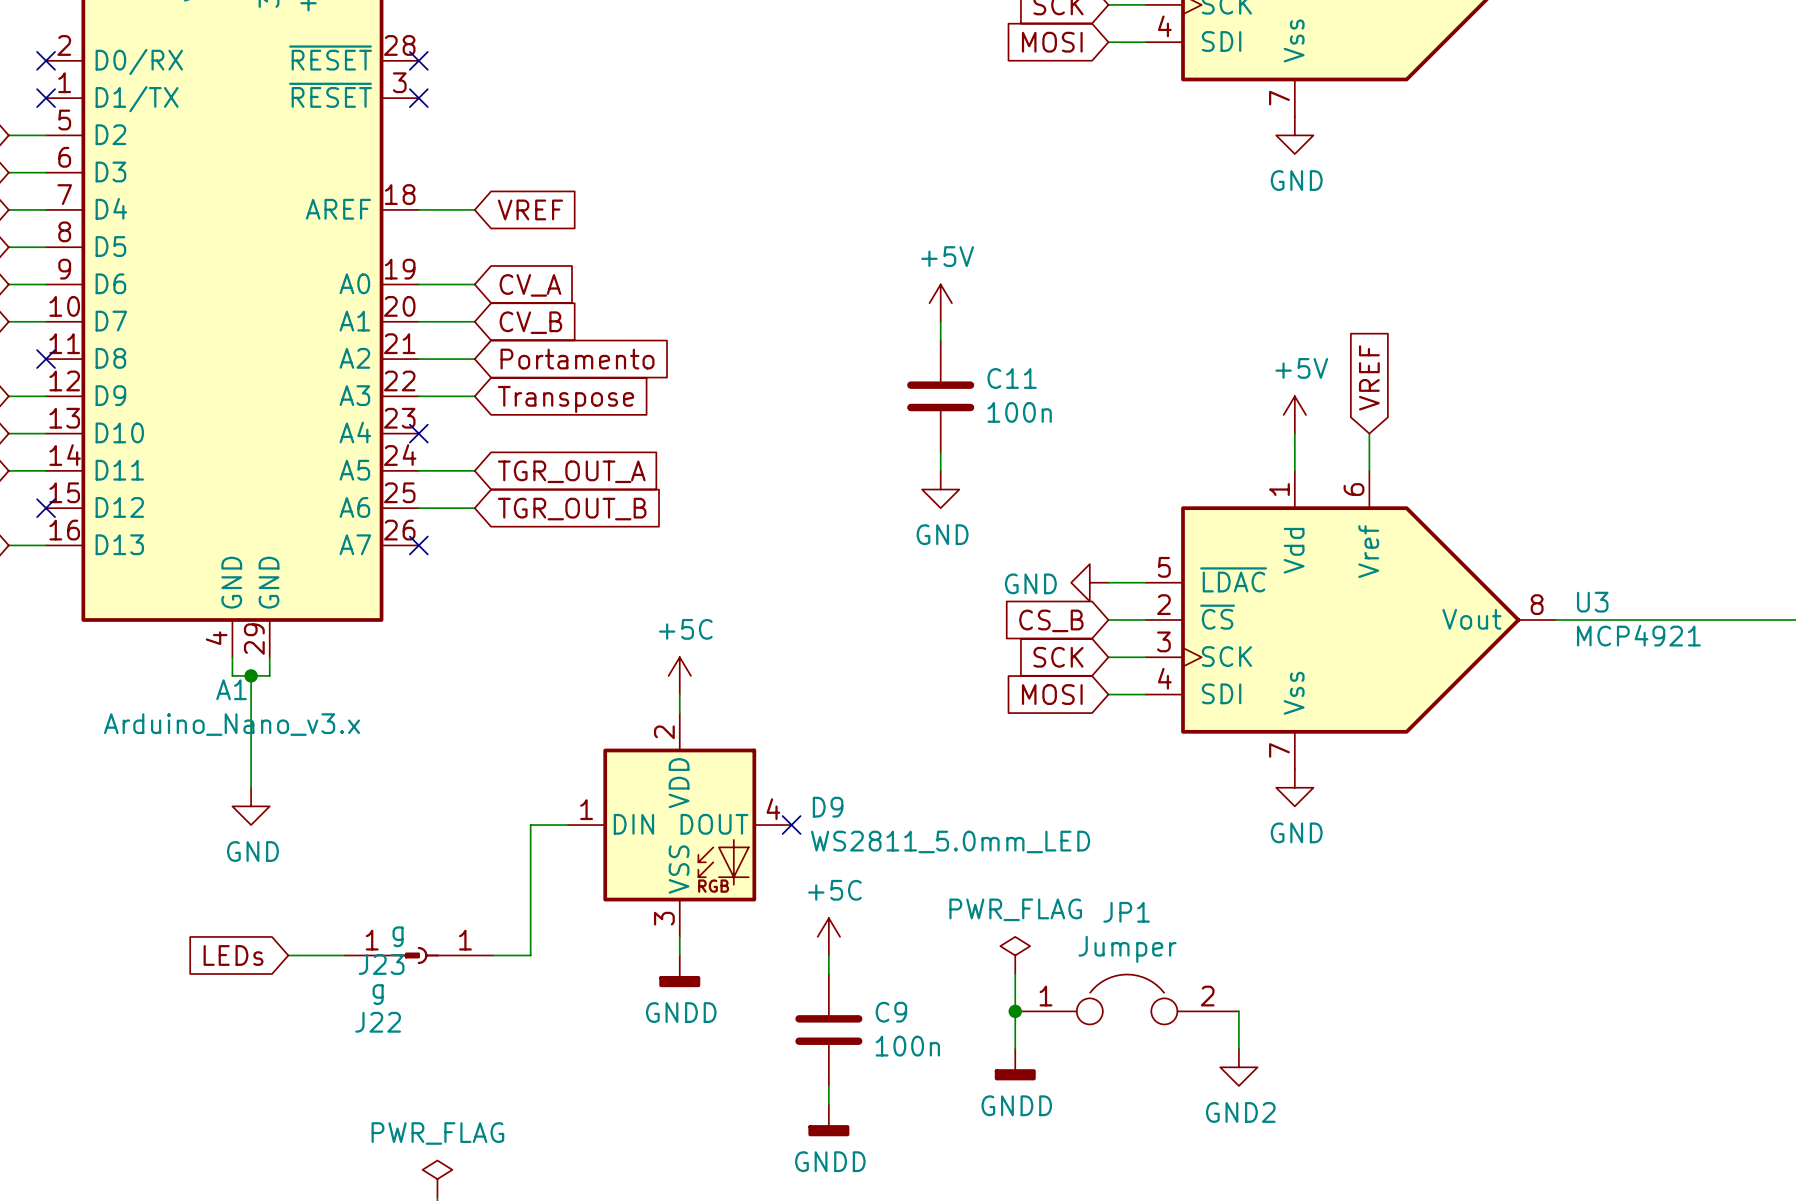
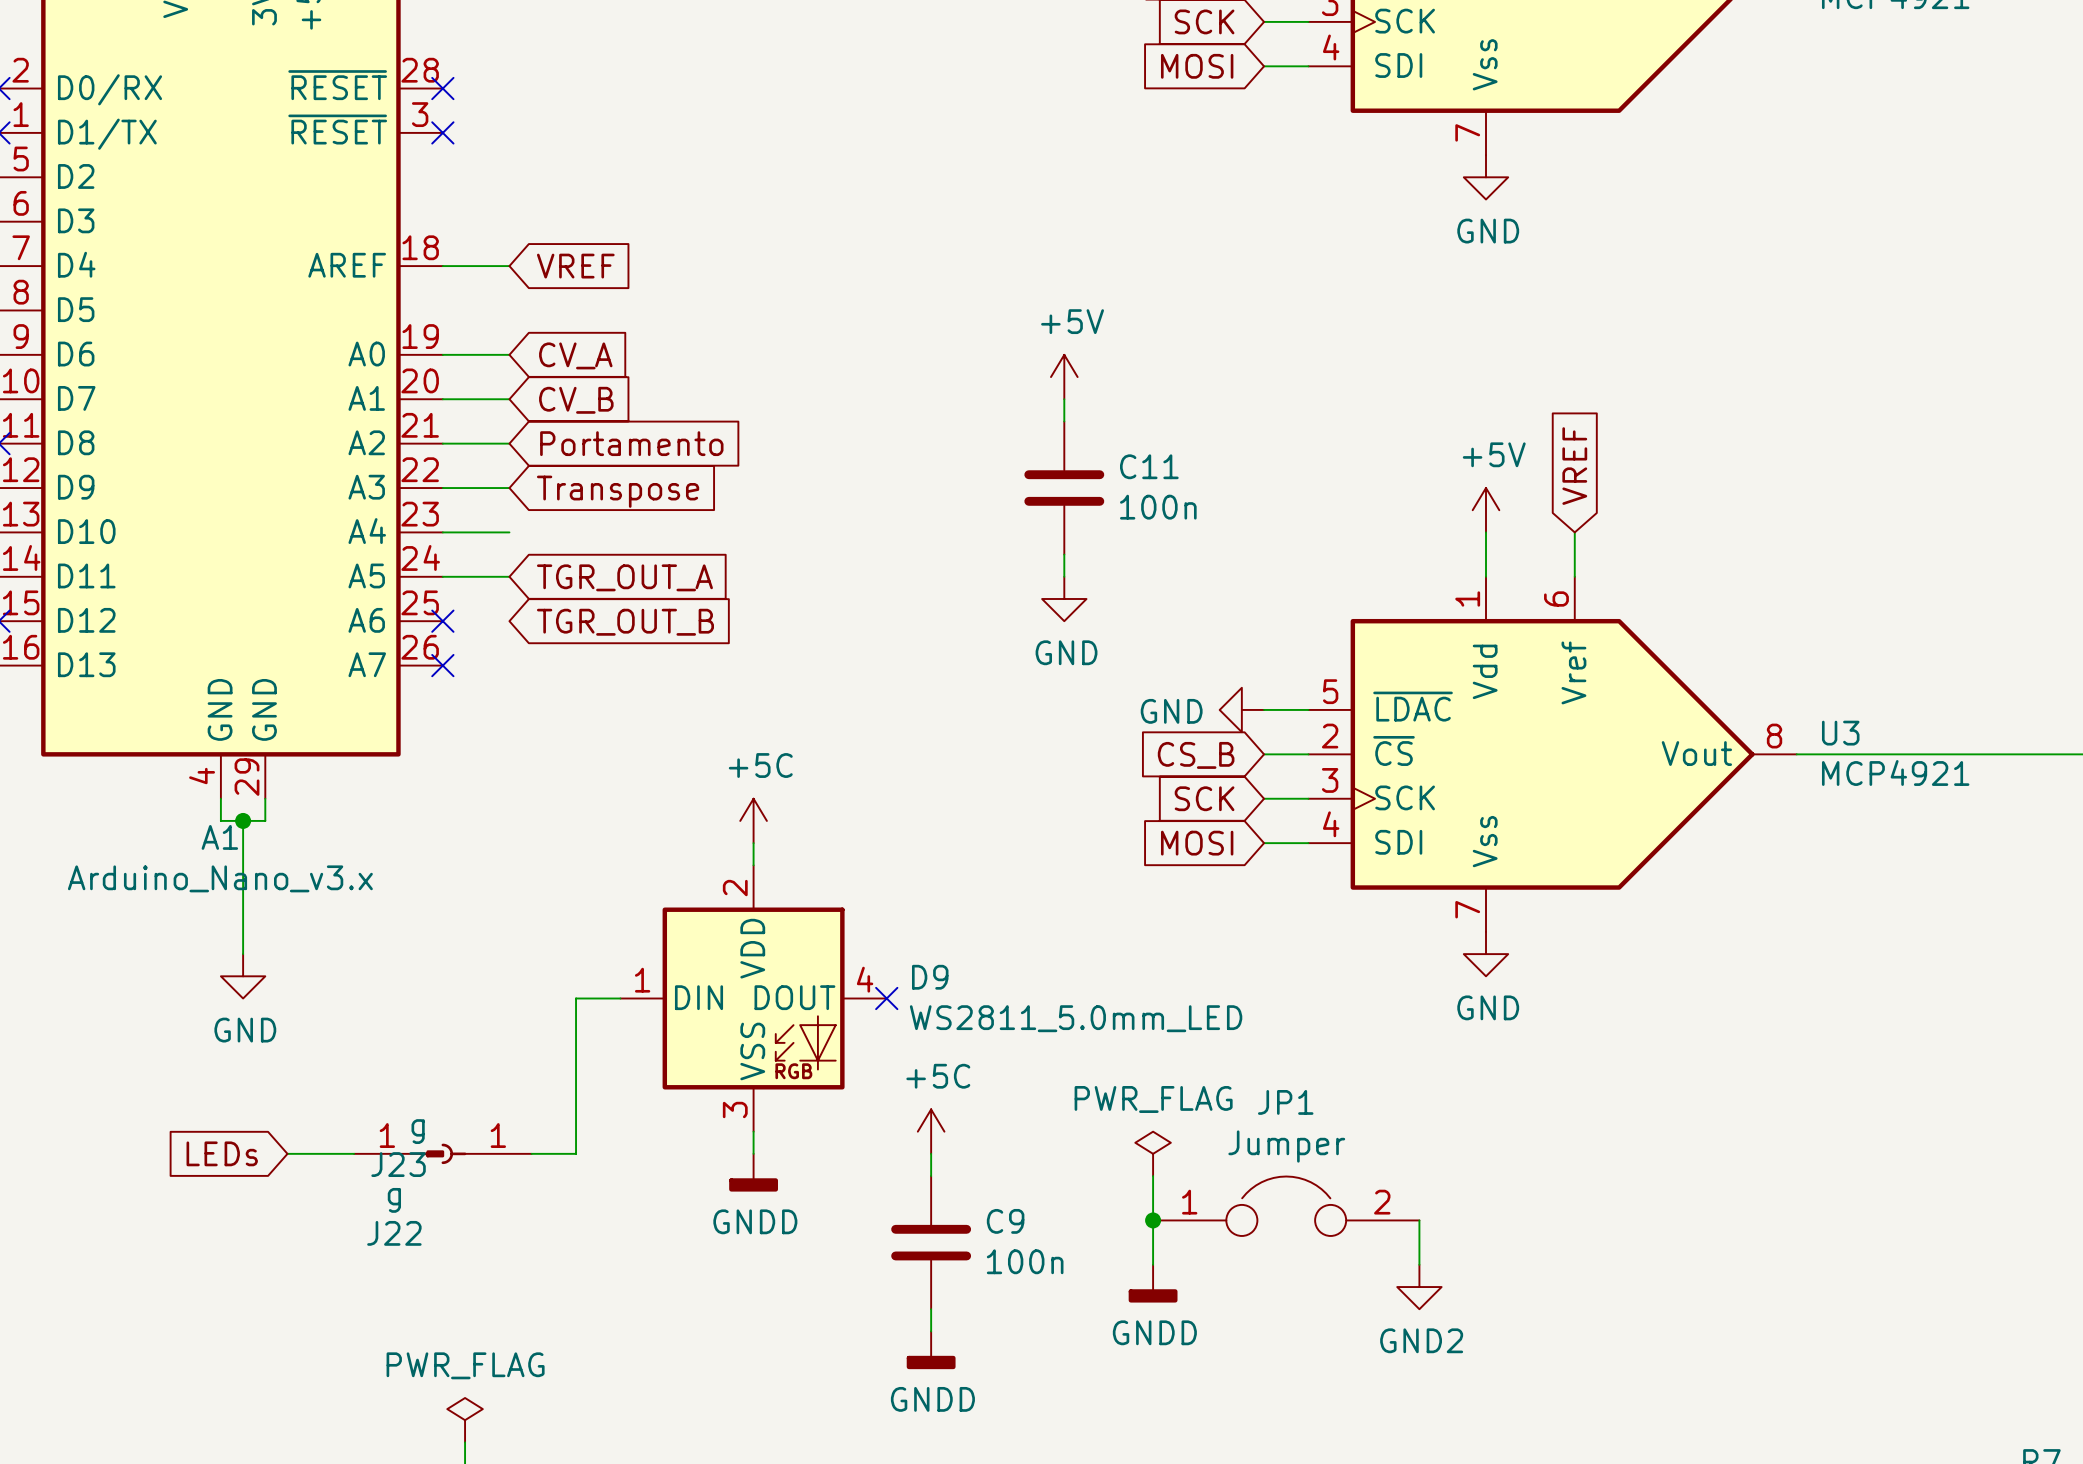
no-connect mark position: (418, 433) -> (442, 621)
wire: (418, 508) (474, 508) -> (442, 532) (509, 532)

